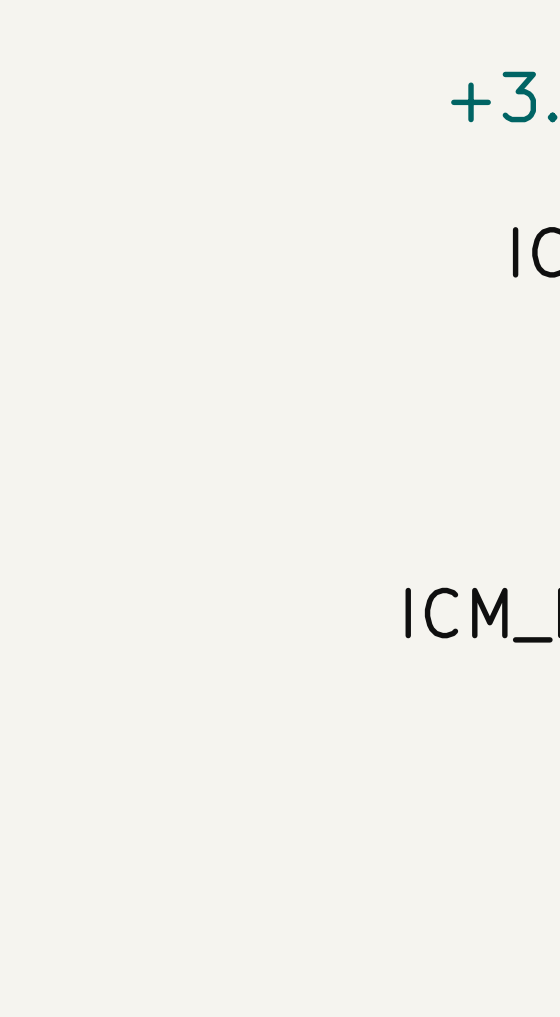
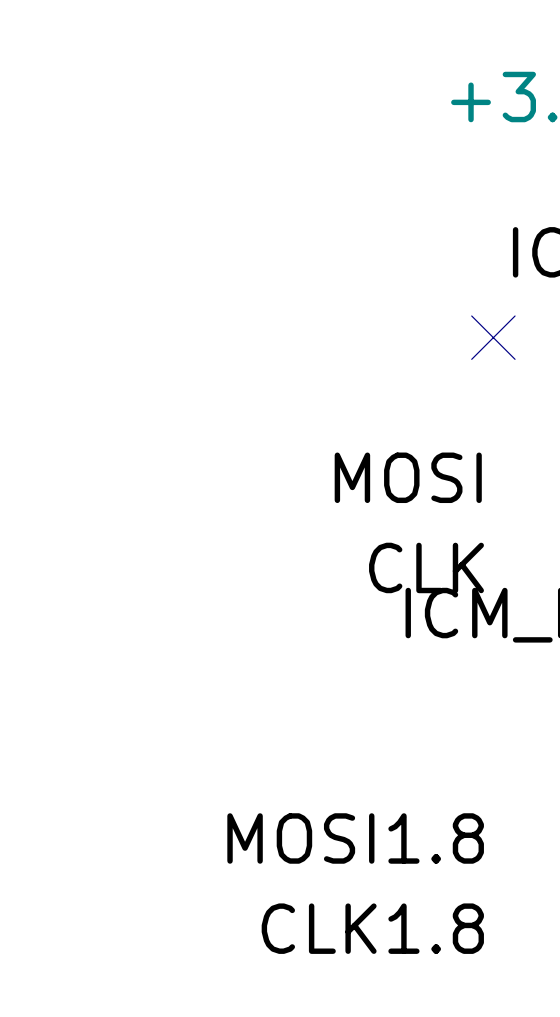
no-connect mark: none -> (493, 337)
label: none -> MOSI (408, 477)
label: none -> CLK (426, 567)
label: none -> MOSI1.8 (355, 838)
label: none -> CLK1.8 (372, 928)

